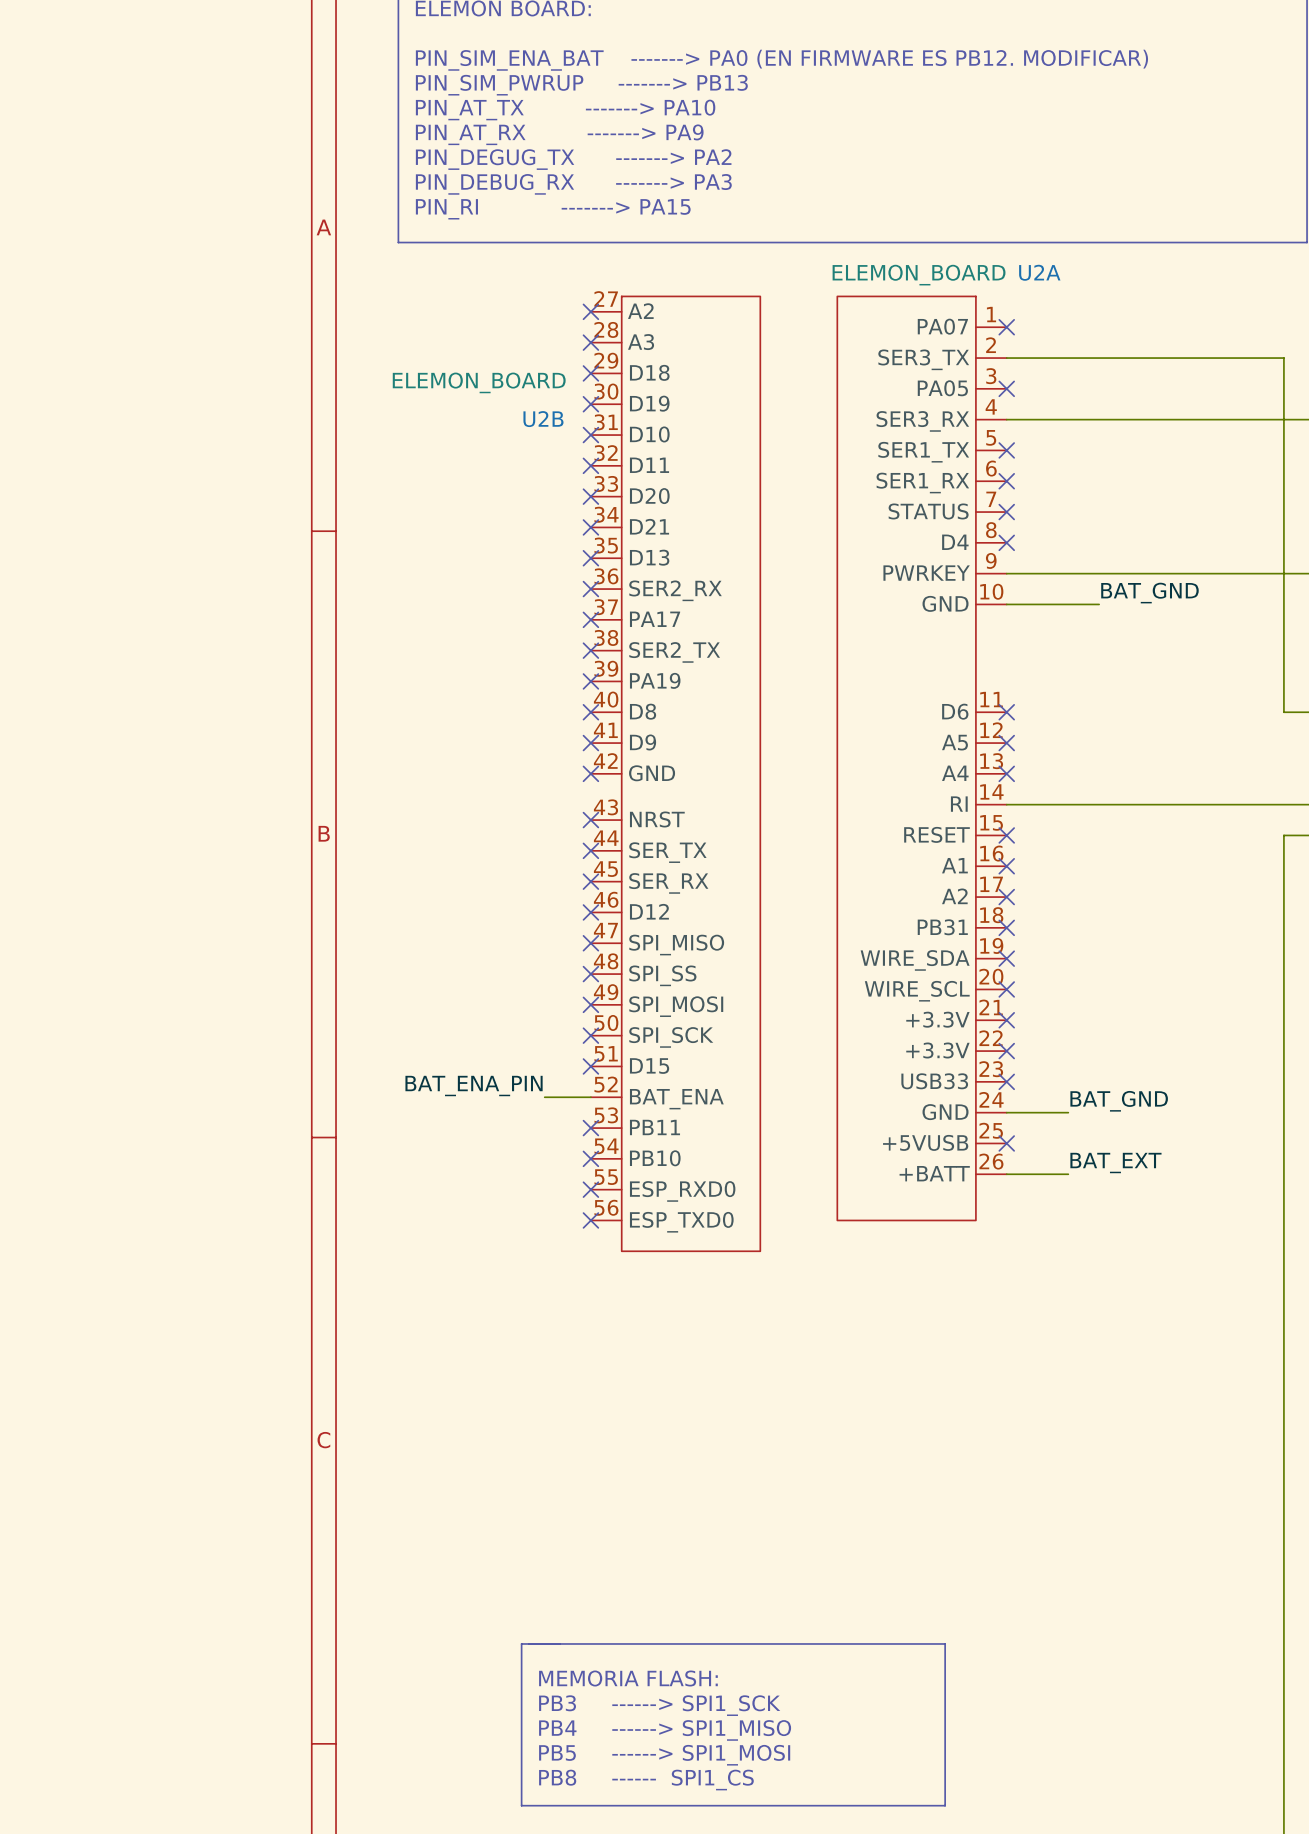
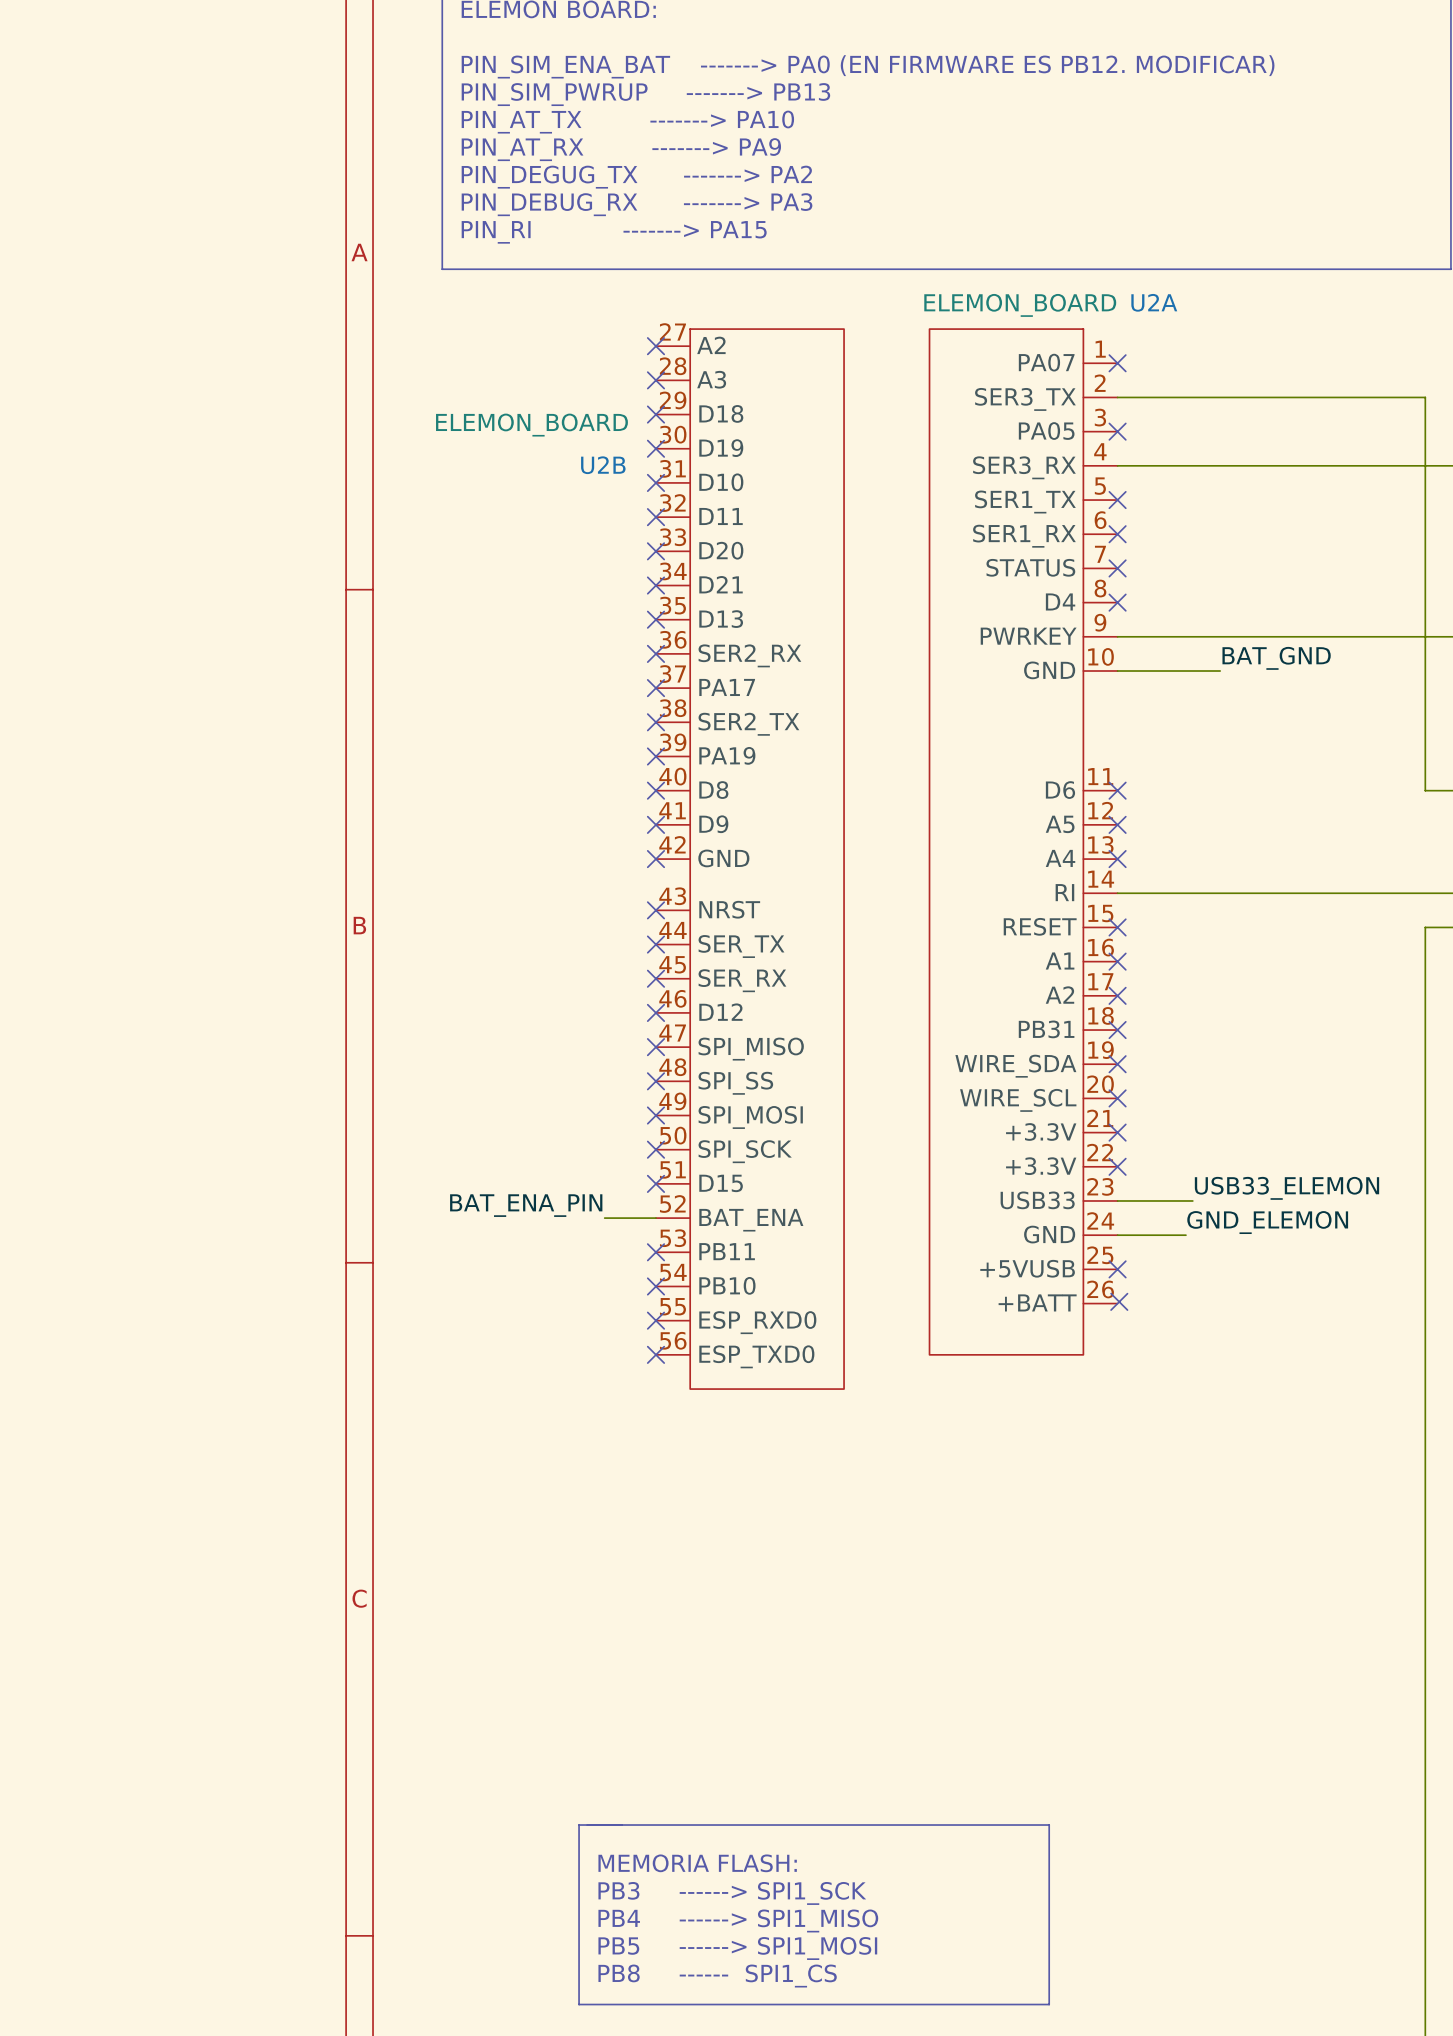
label: none -> USB33_ELEMON (1286, 1188)
wire: none -> (1117, 1200) (1192, 1200)
no-connect mark: (1006, 1081) -> none
label: BAT_GND (1119, 1101) -> GND_ELEMON (1267, 1222)
label: BAT_EXT (1115, 1163) -> none
no-connect mark: none -> (1119, 1301)
wire: (1006, 1174) (1068, 1174) -> none

